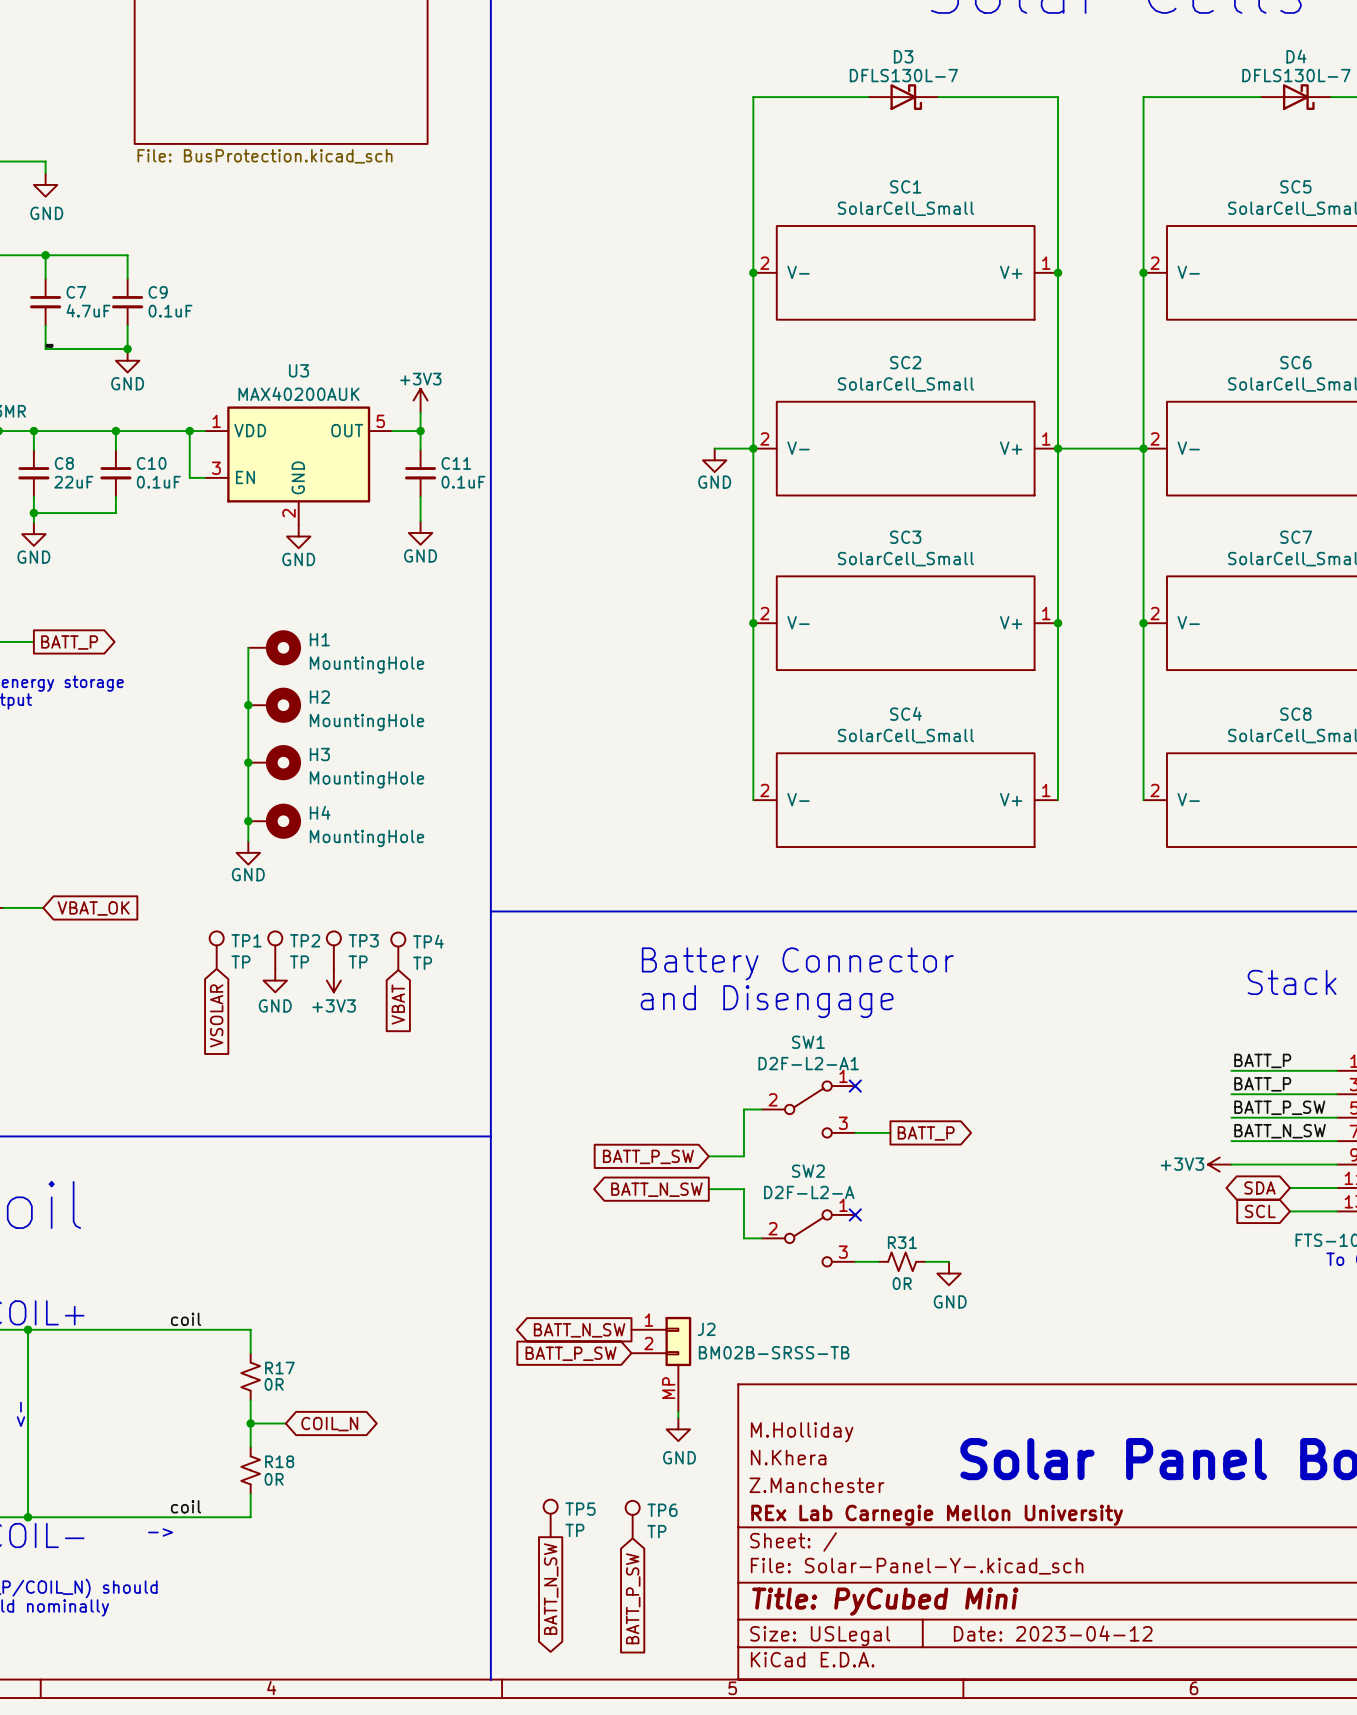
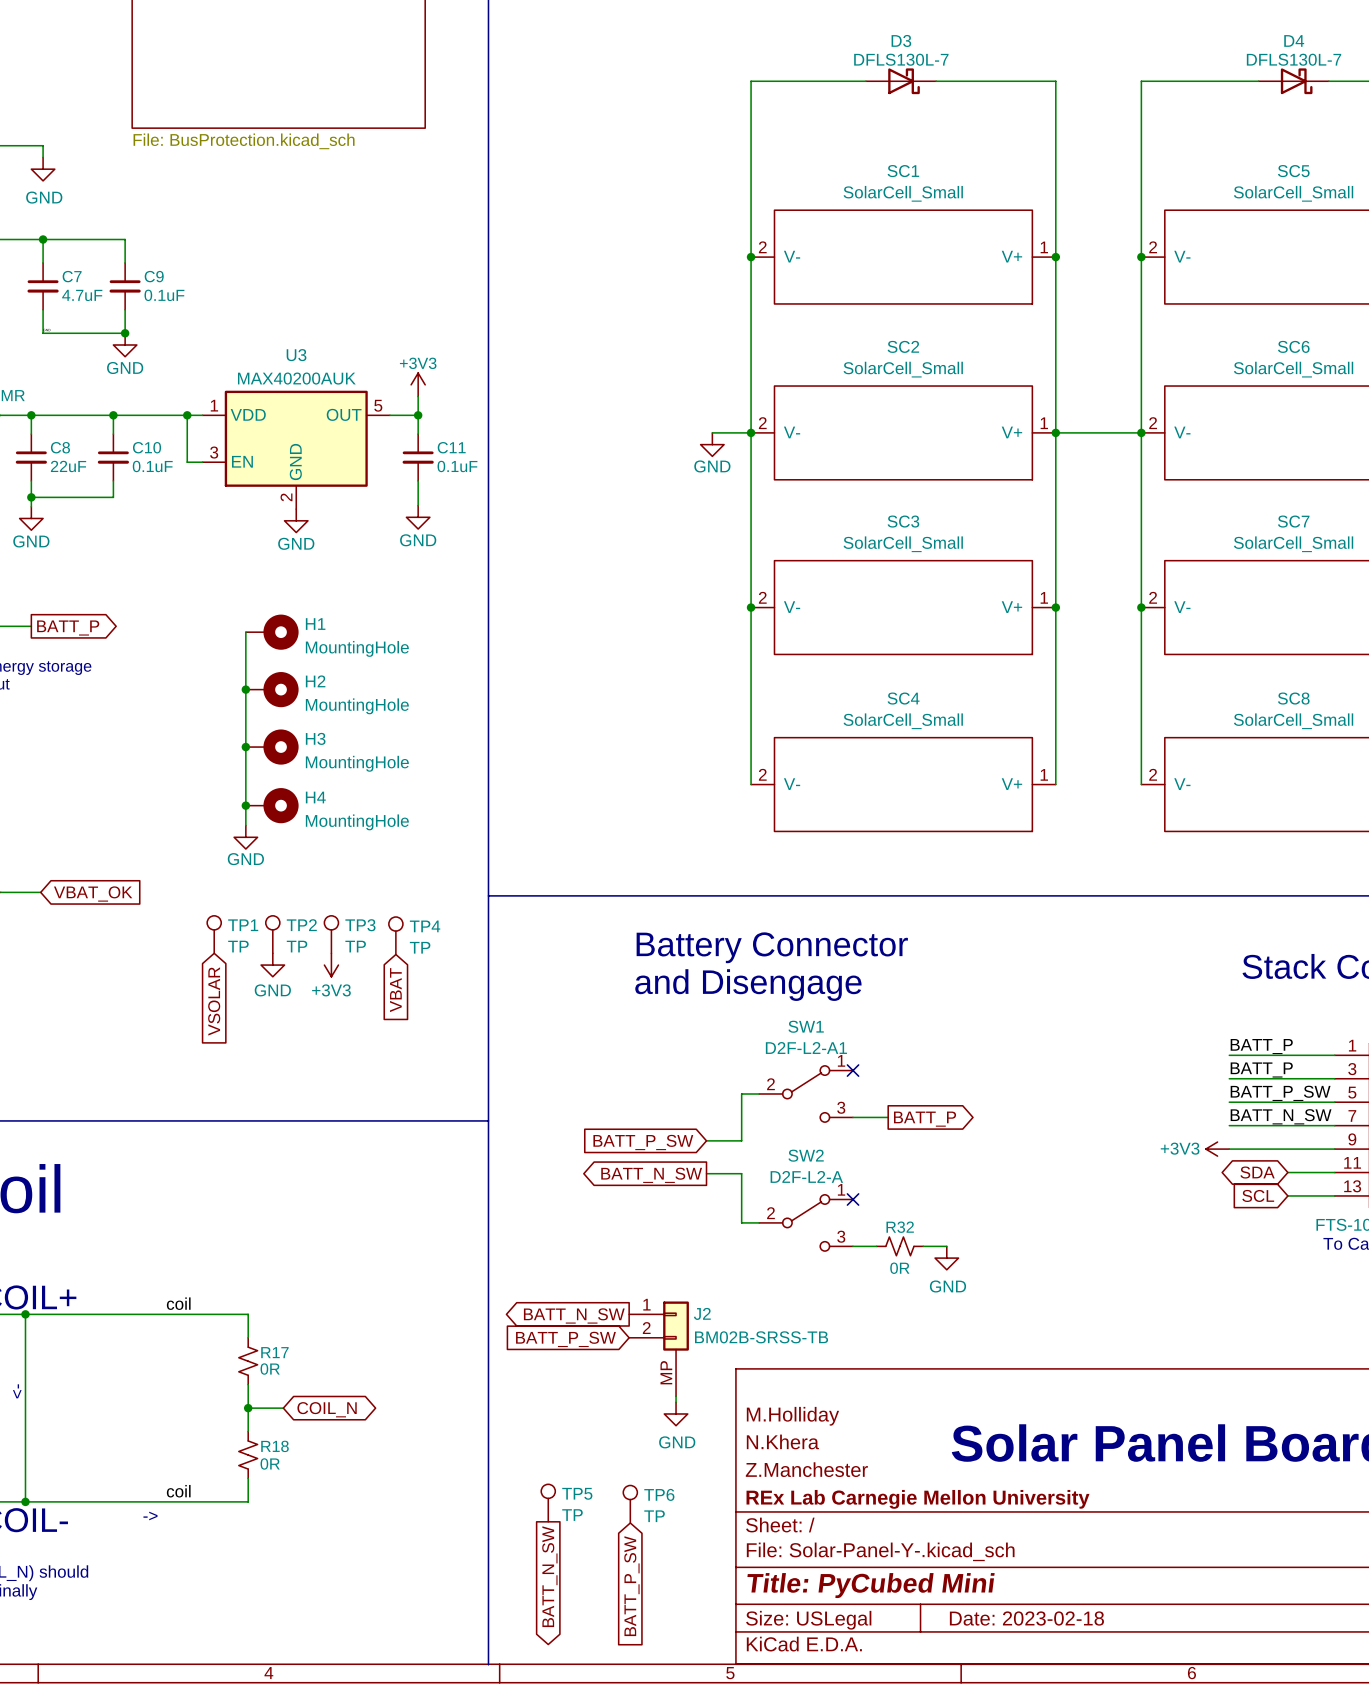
R31 name: R31 (902, 1242) -> R32 (900, 1227)
title block: Date: 2023-04-12 (1053, 1633) -> Date: 2023-02-18 (1026, 1618)

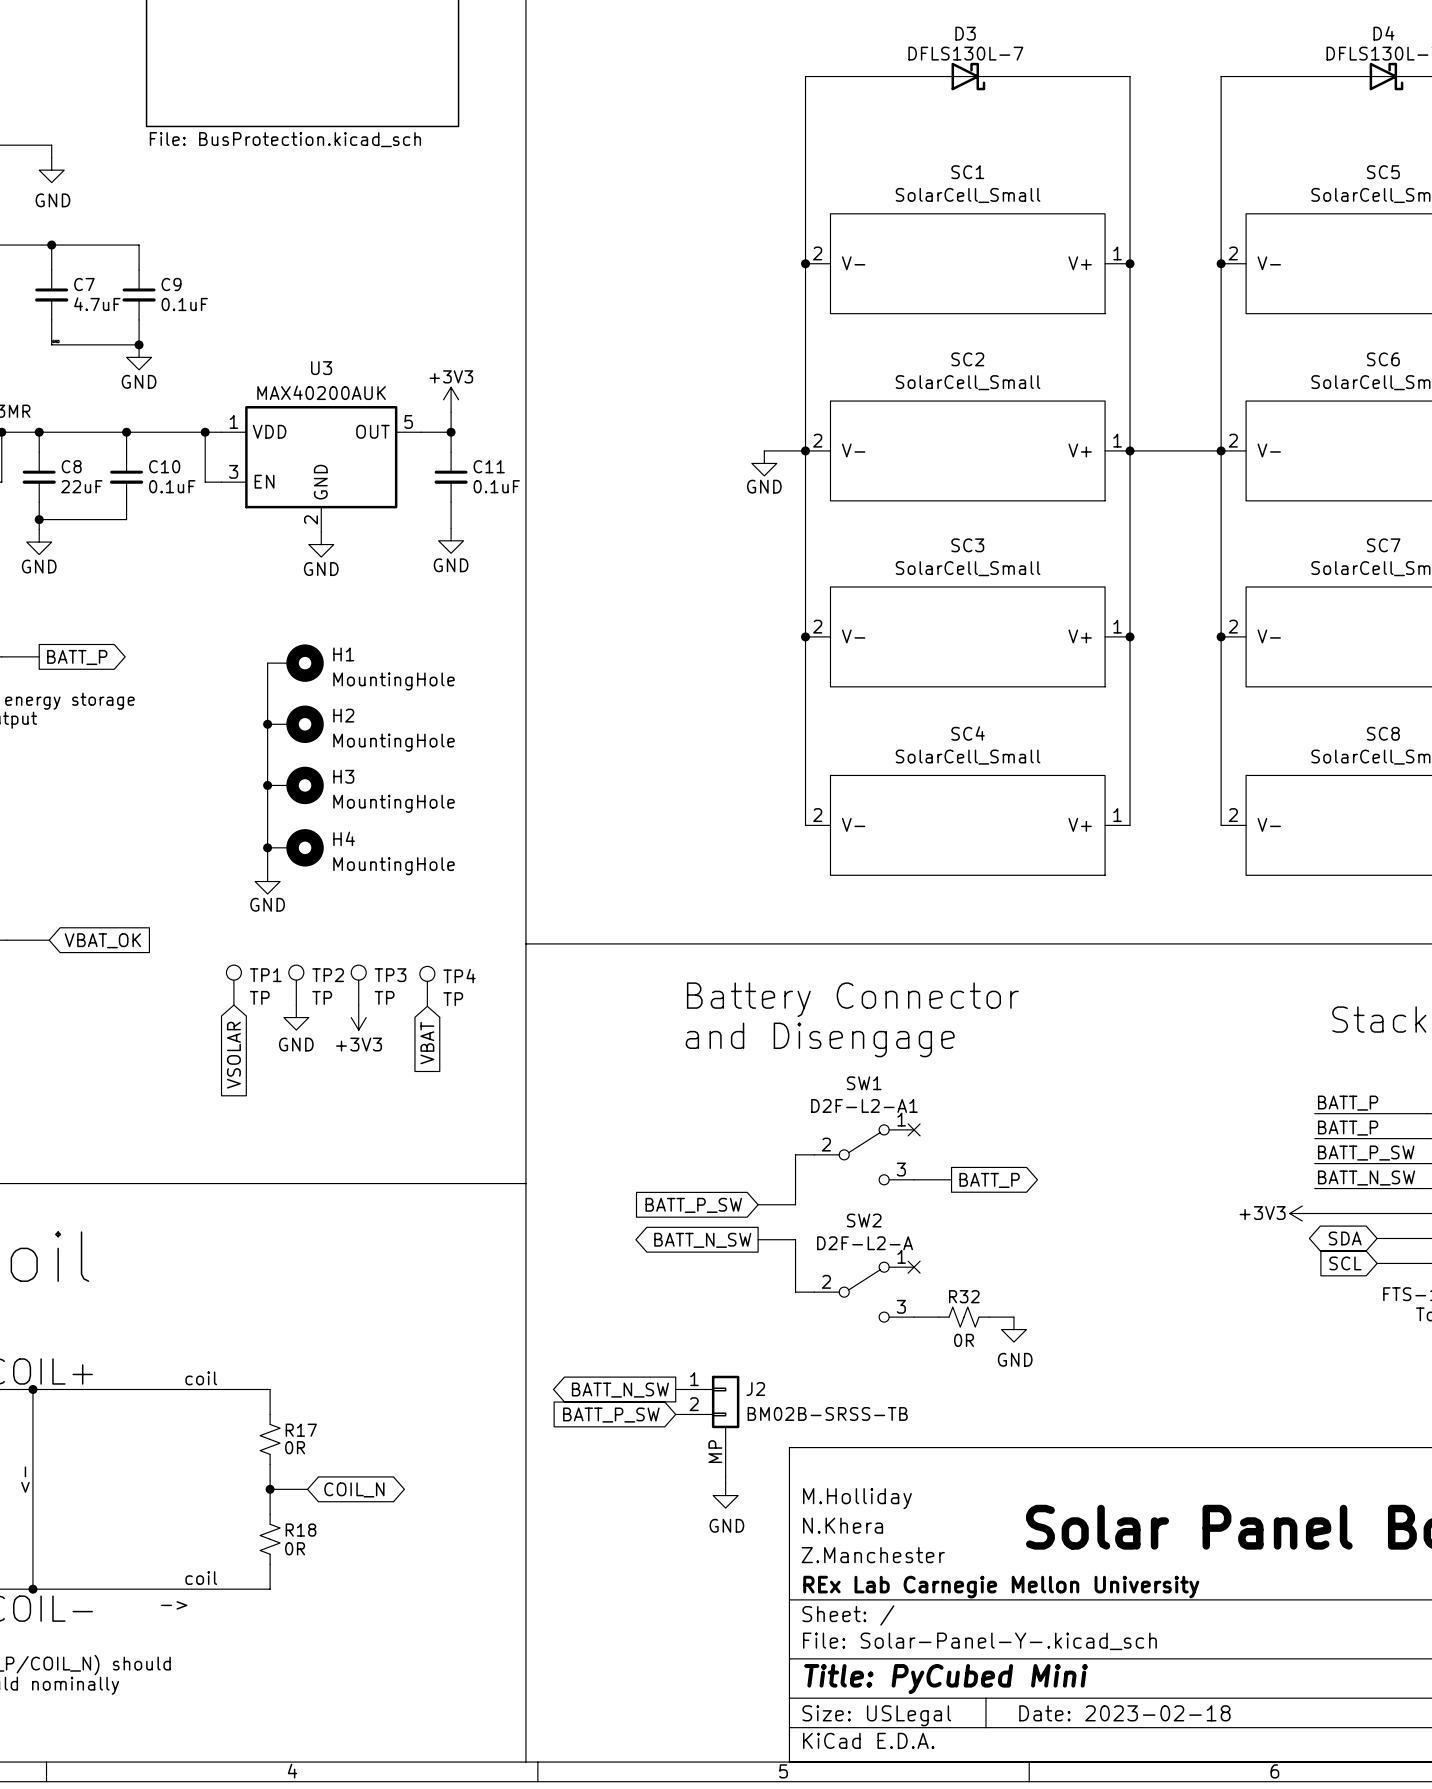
TP5: TP (548, 1503) -> none
TP6: TP (630, 1504) -> none
global label: BATT_N_SW (549, 1576) -> none
global label: BATT_P_SW (631, 1586) -> none

